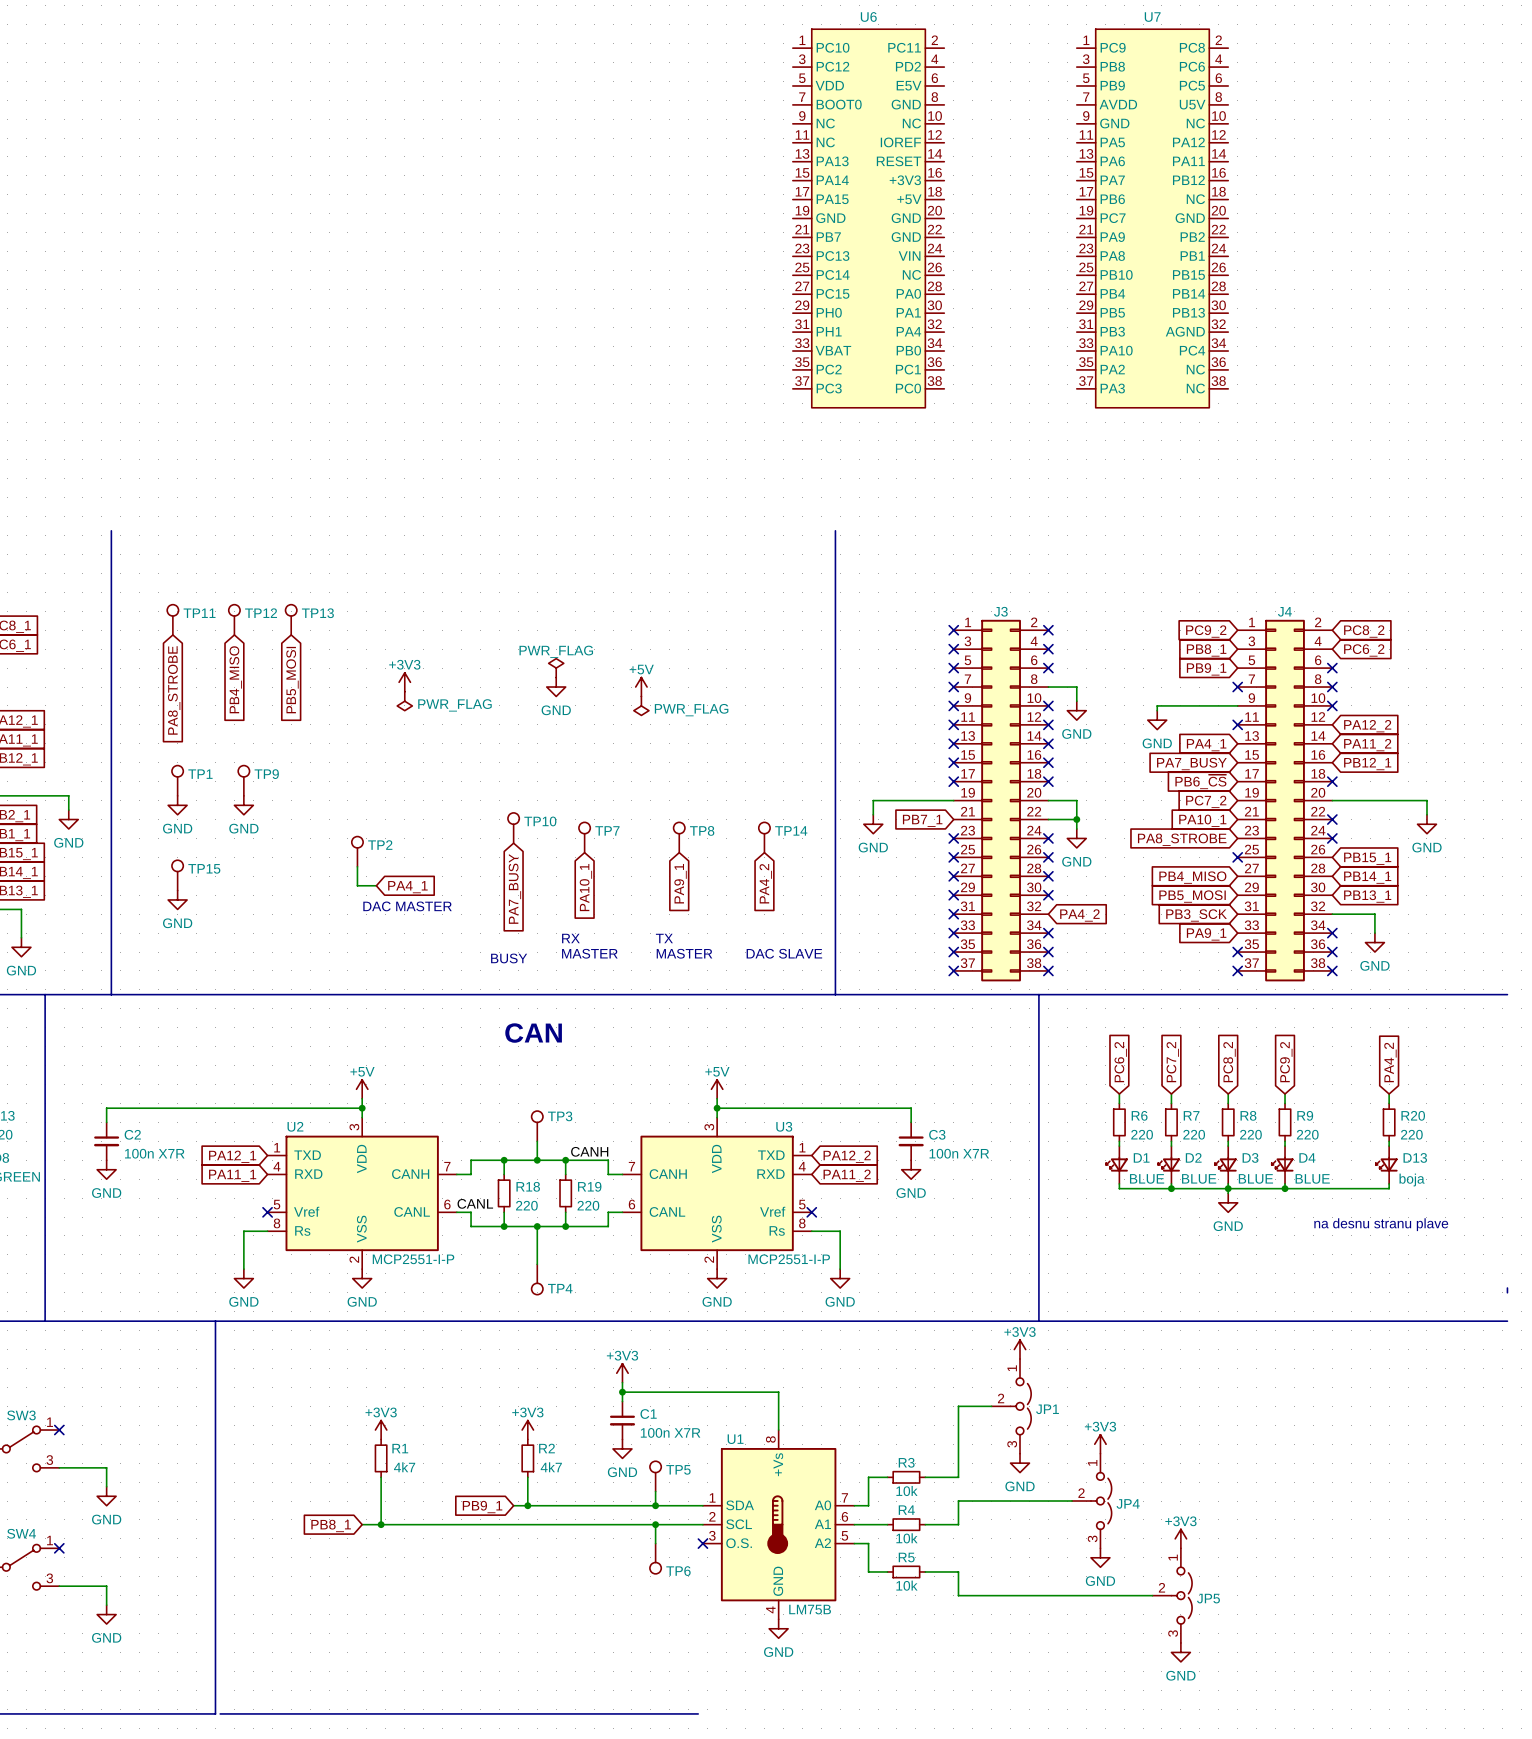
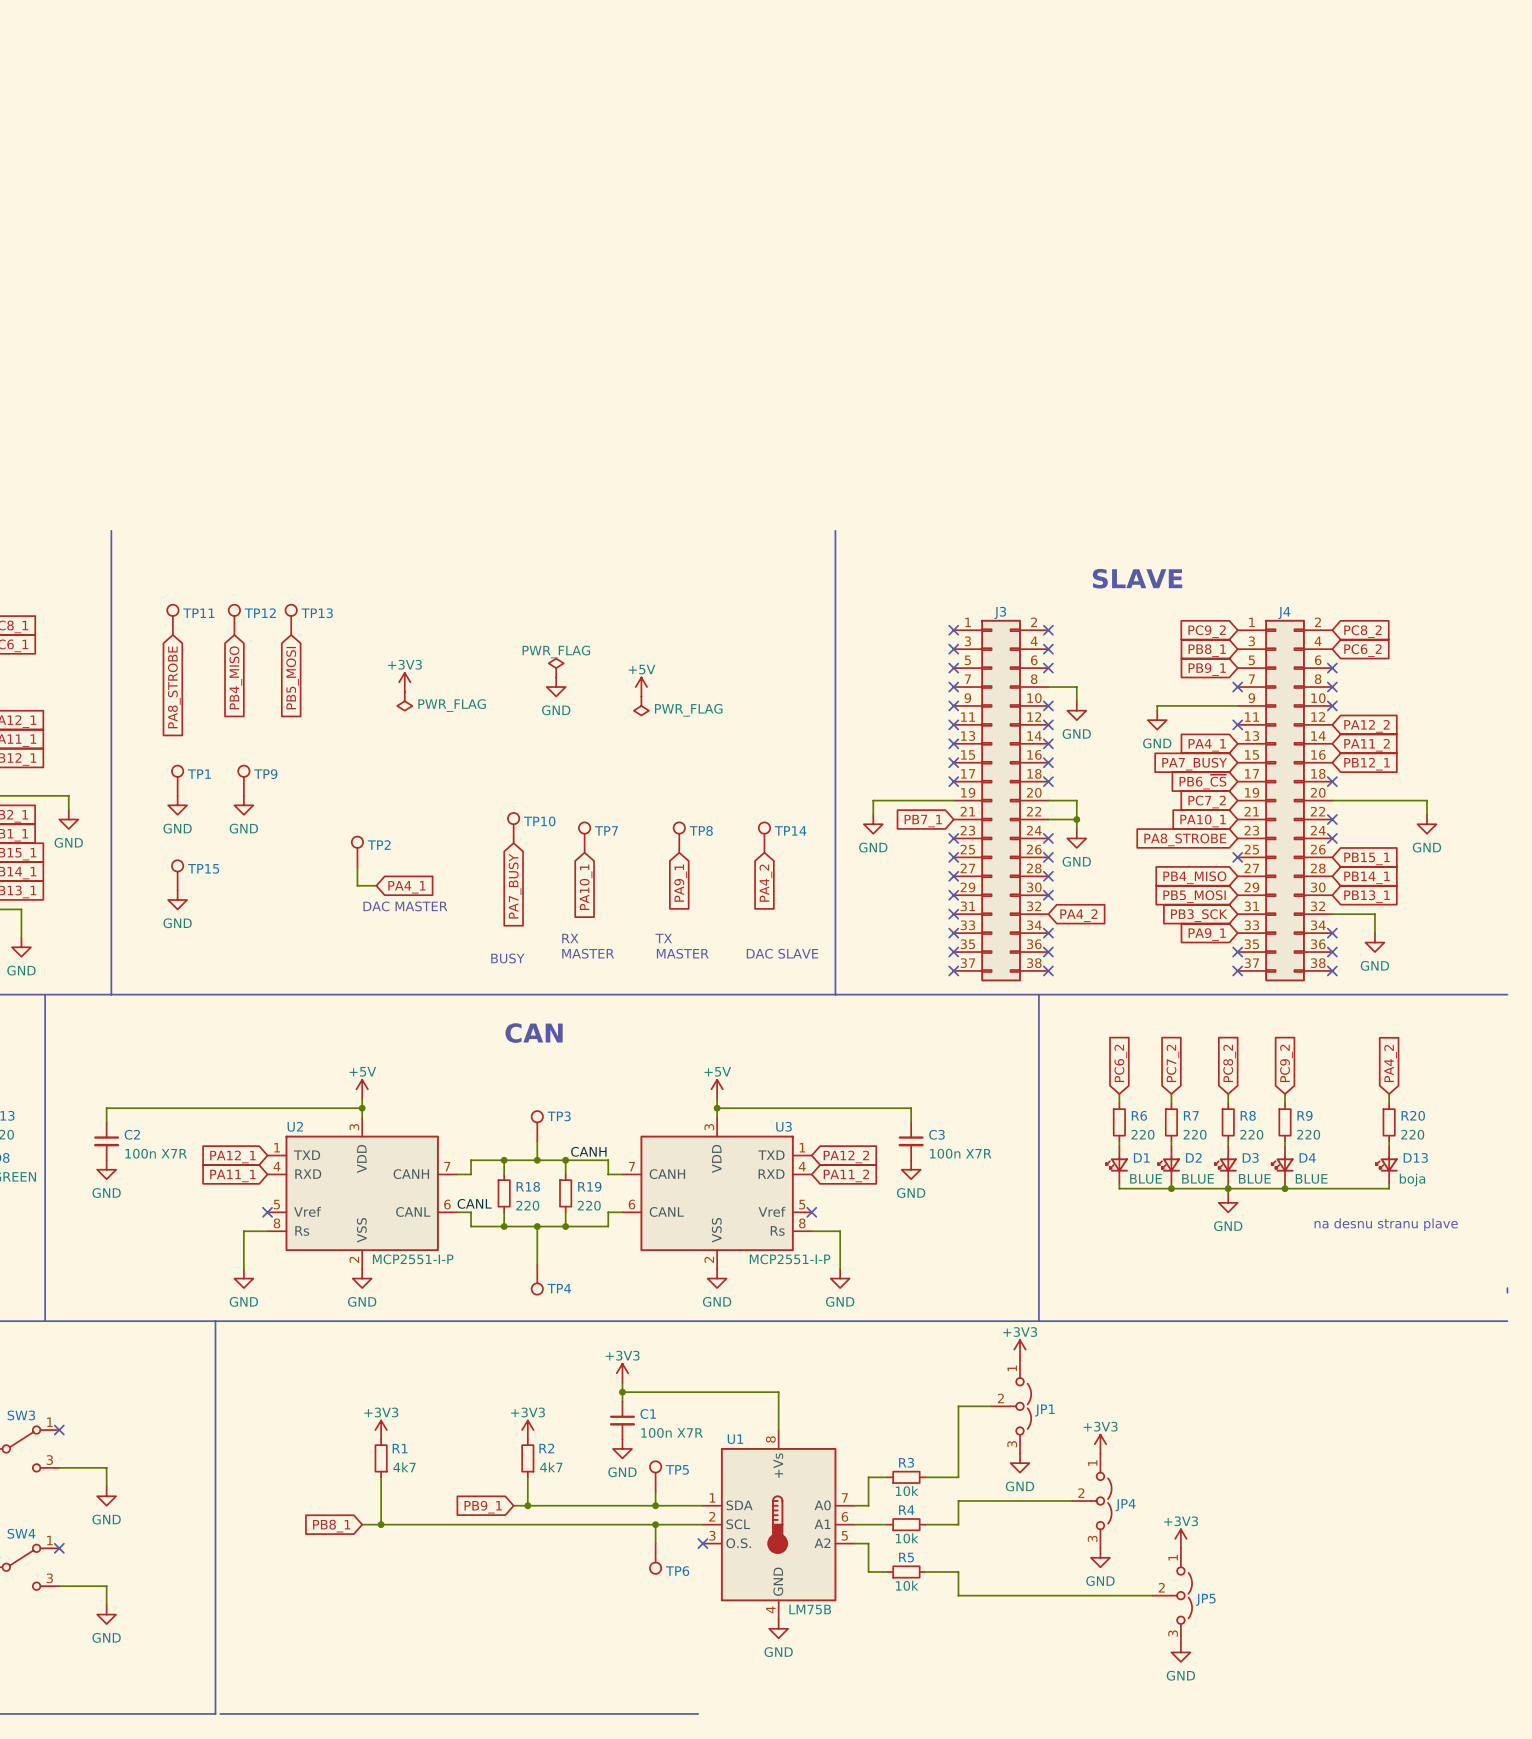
U6: (868, 218) -> none
U7: (1152, 218) -> none
text: none -> SLAVE (1137, 578)

